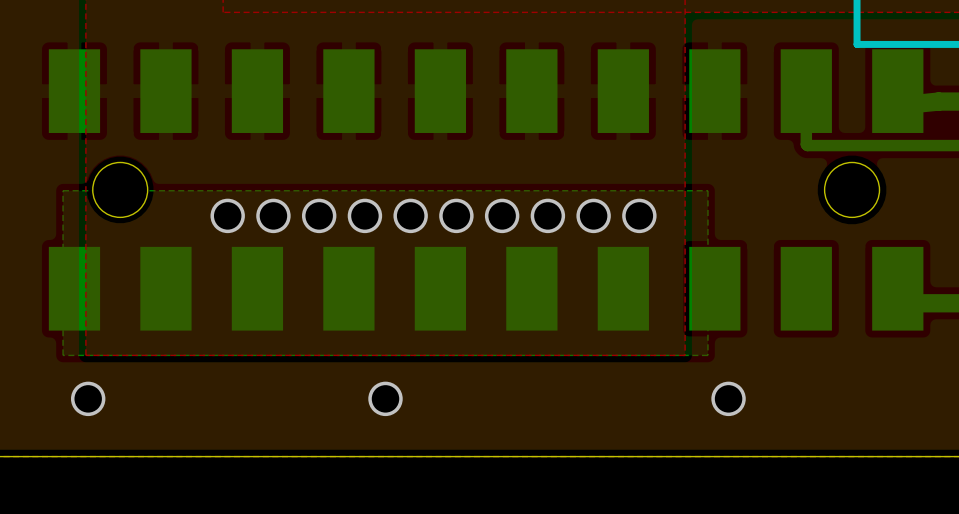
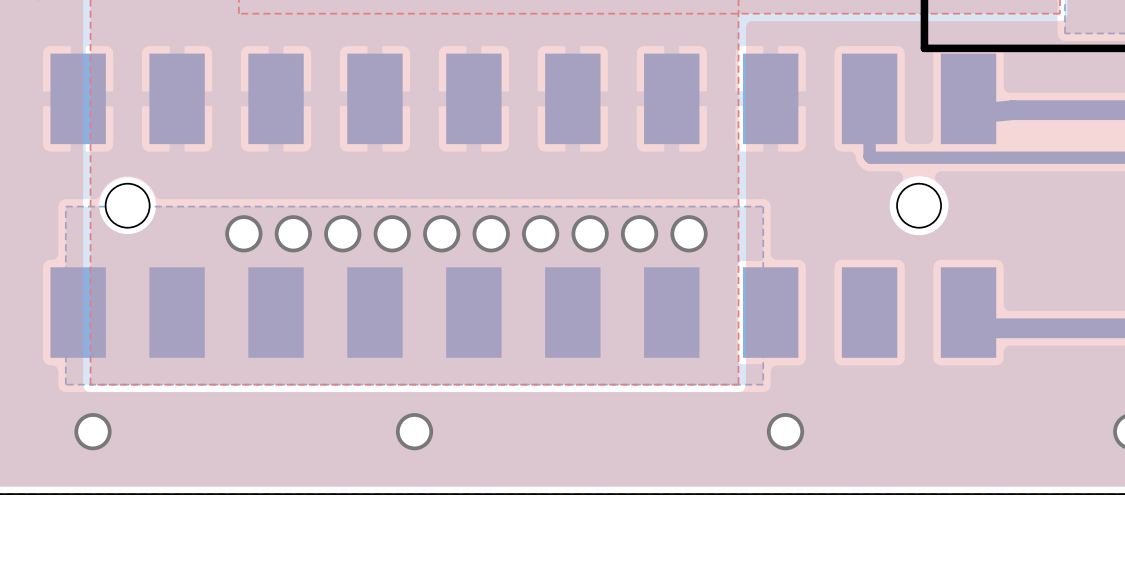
part footprint: [48, 49, 924, 331] -> [50, 53, 997, 358]

